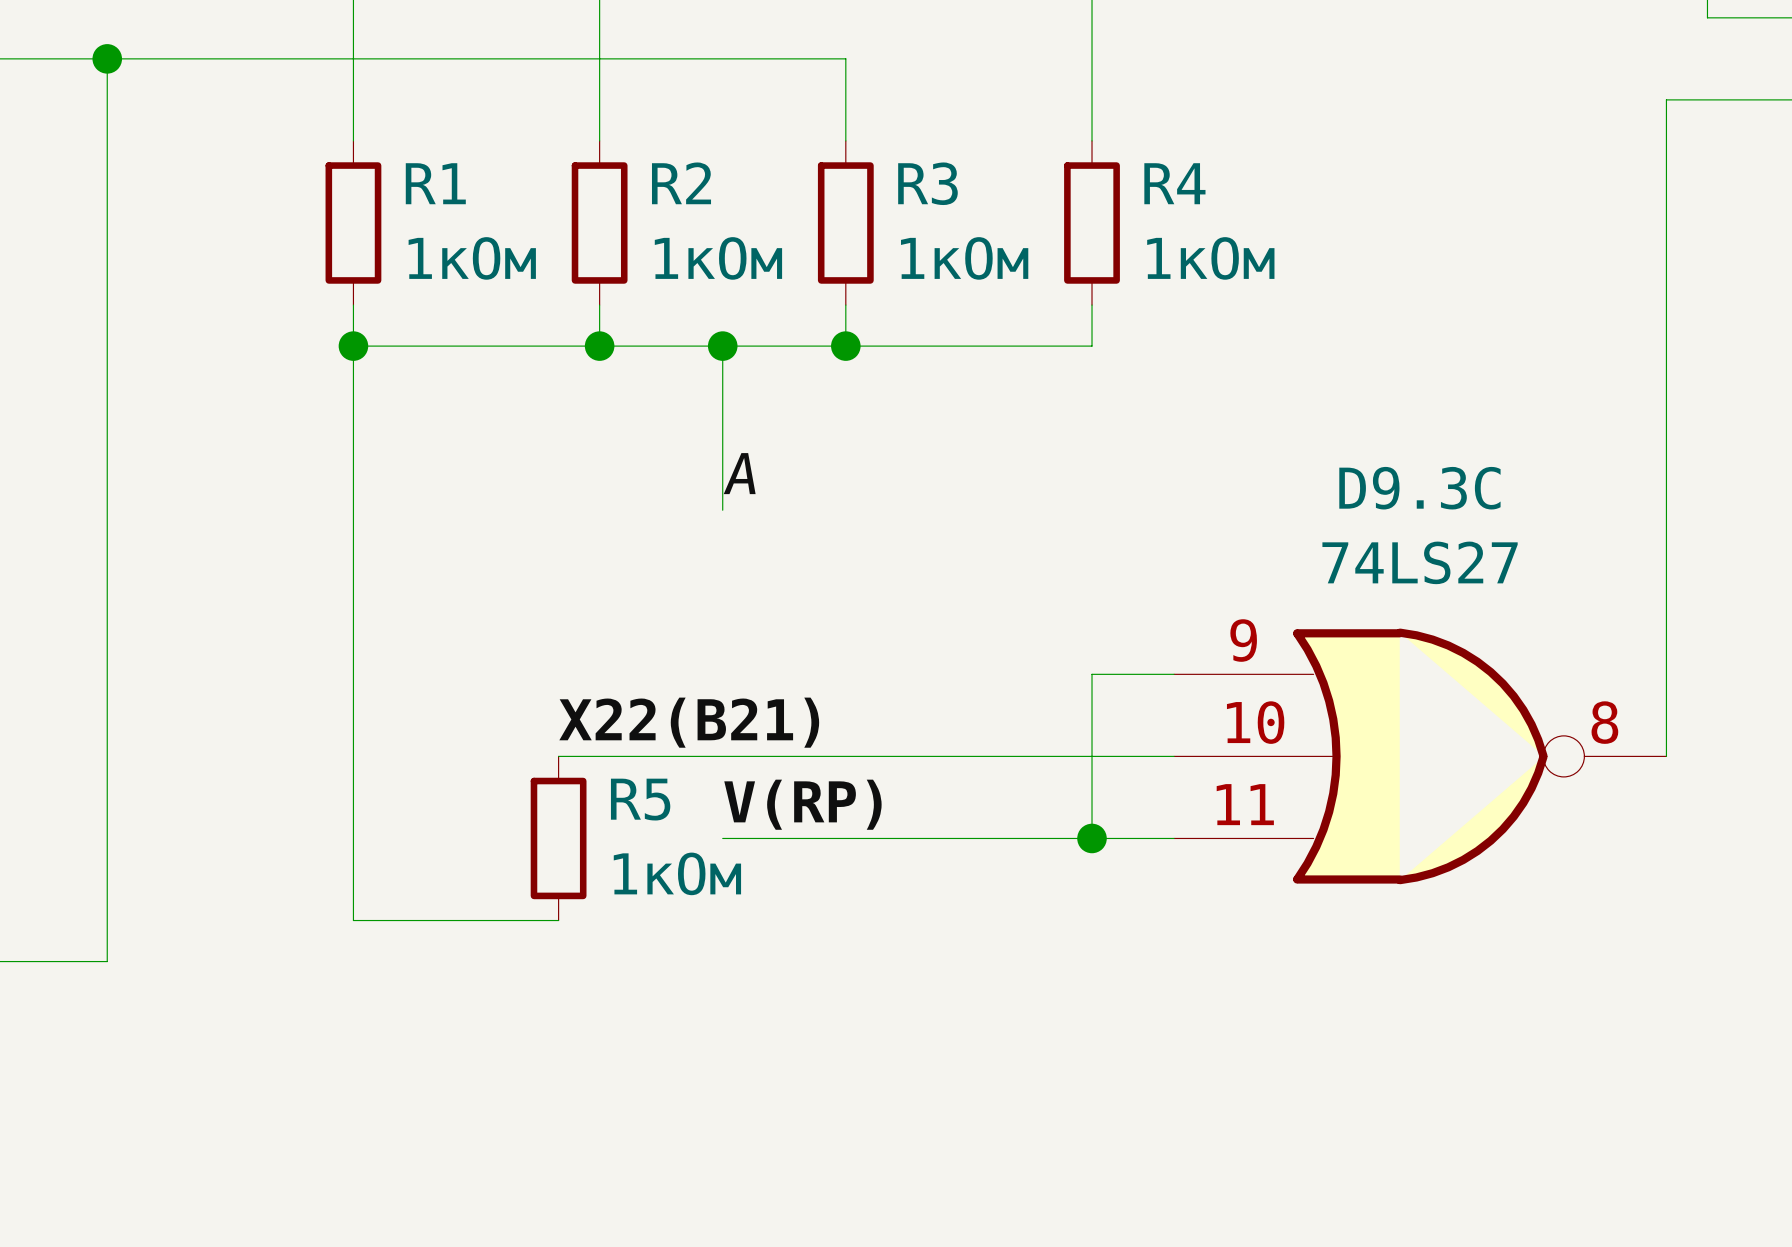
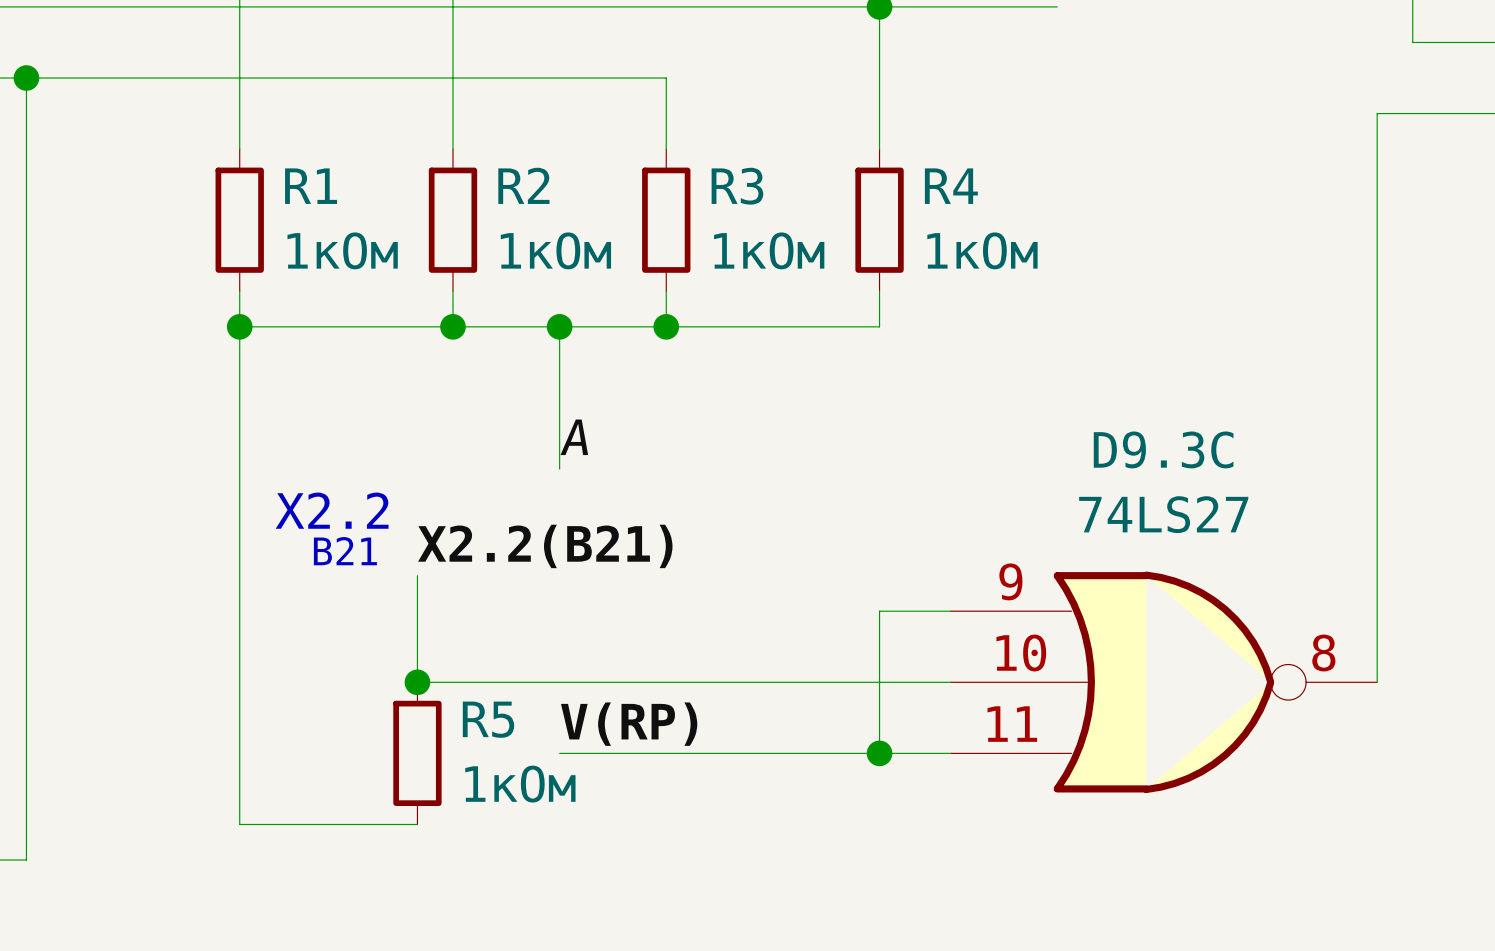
text: none -> X2.2 (332, 510)
label: none -> X2.2(B21) (545, 546)
text: none -> B21 (345, 551)
wire: none -> (417, 575) (417, 682)
label: X22(B21) (689, 722) -> none
junction: none -> (417, 682)

